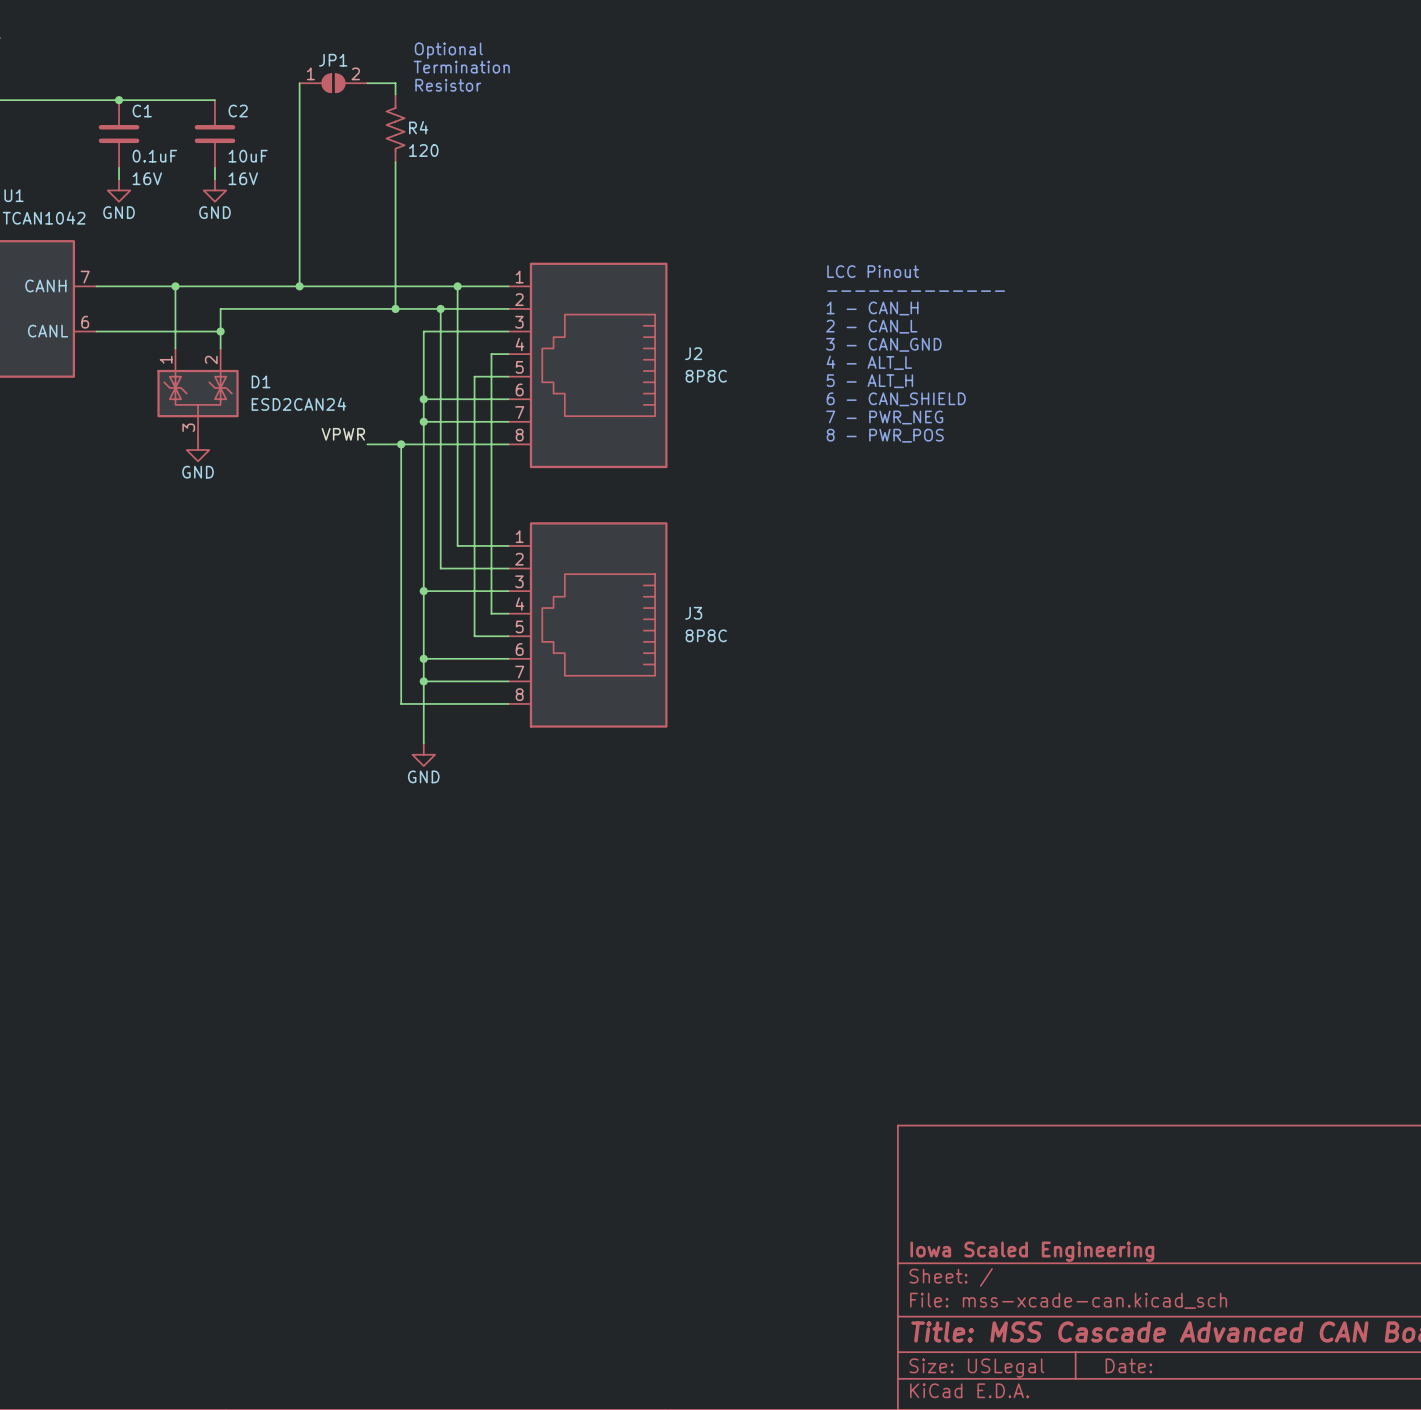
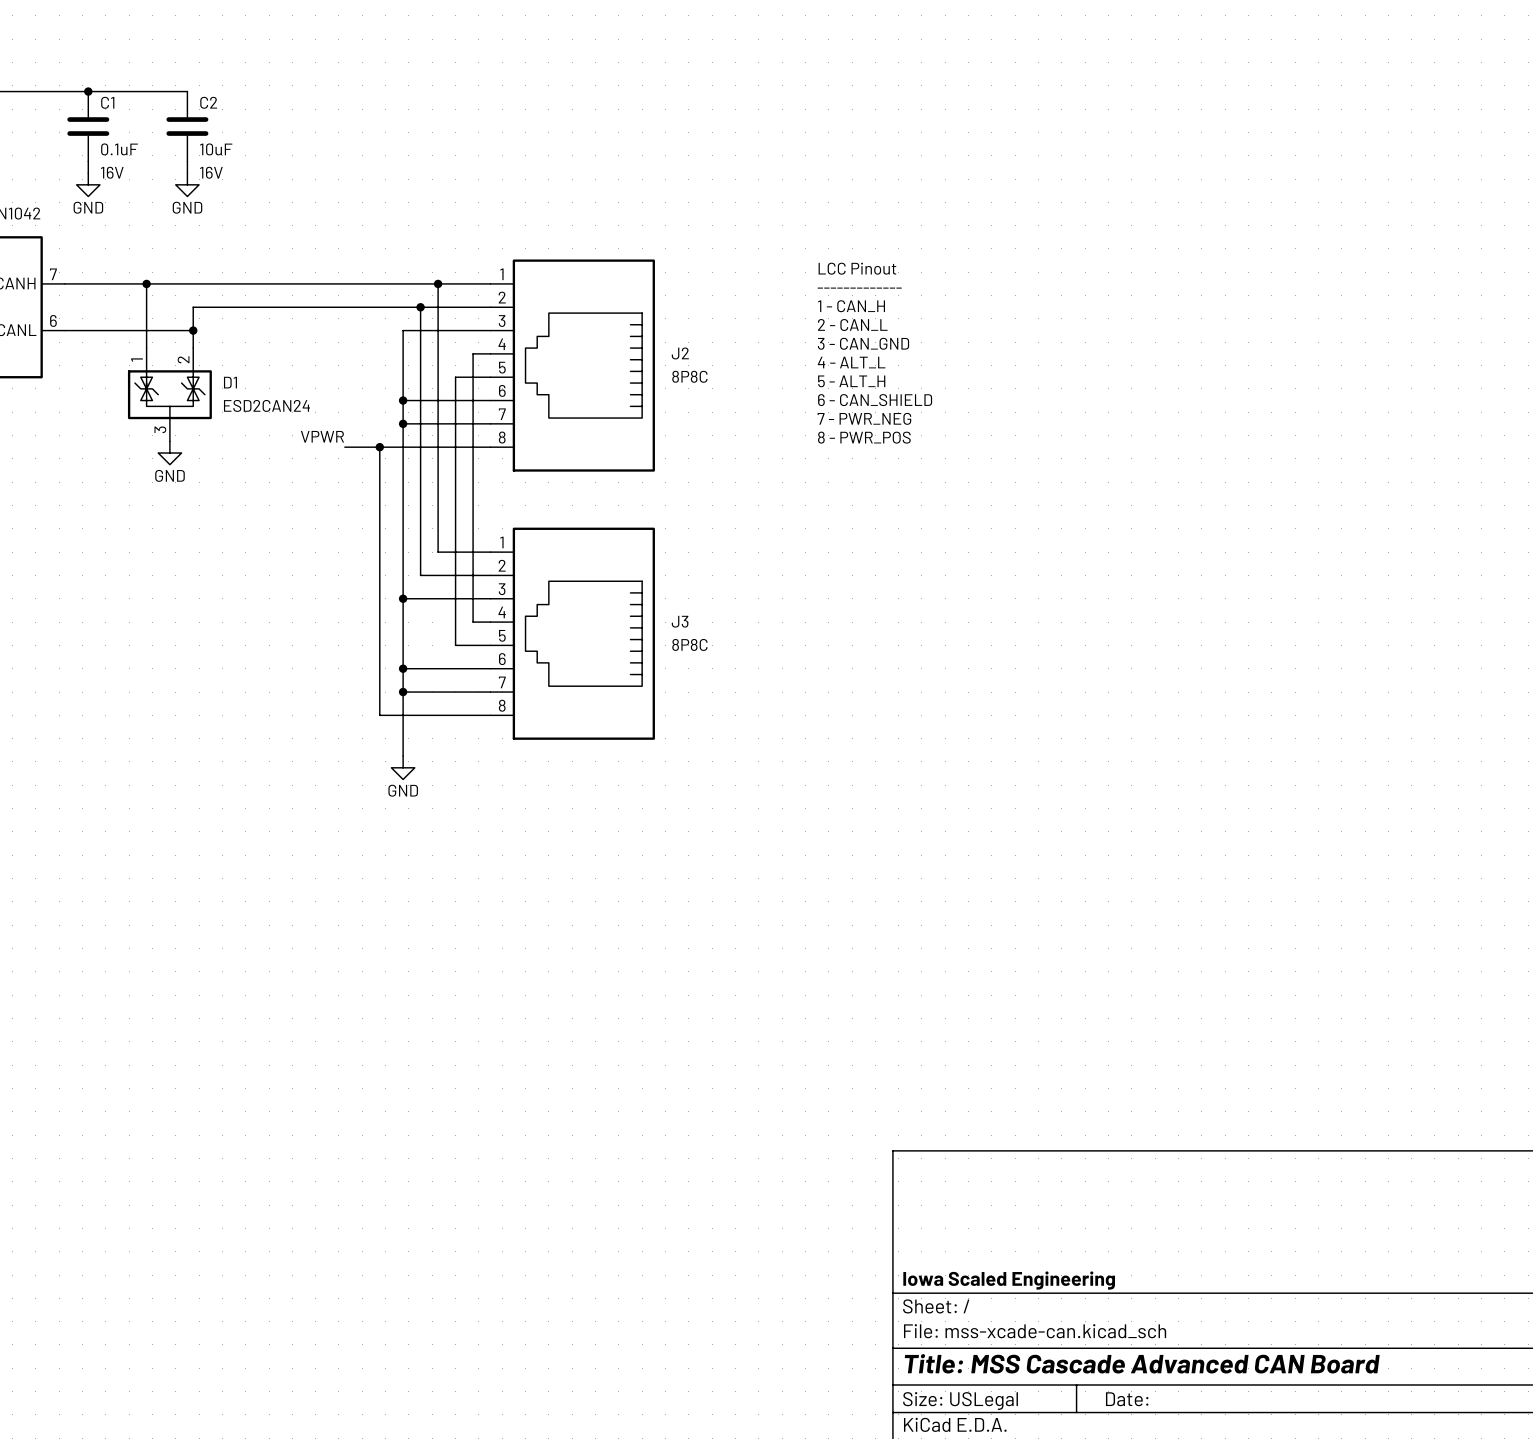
text: Optional (448, 50) -> none
text: Termination (461, 67) -> none
wire: (299, 83) (299, 286) -> none
JP1: (333, 83) -> none
wire: (367, 83) (395, 83) (395, 94) -> none
text: Resistor (448, 85) -> none
R4: 120 (395, 128) -> none
wire: (395, 162) (395, 308) -> none
junction: (299, 286) -> none
junction: (395, 308) -> none

